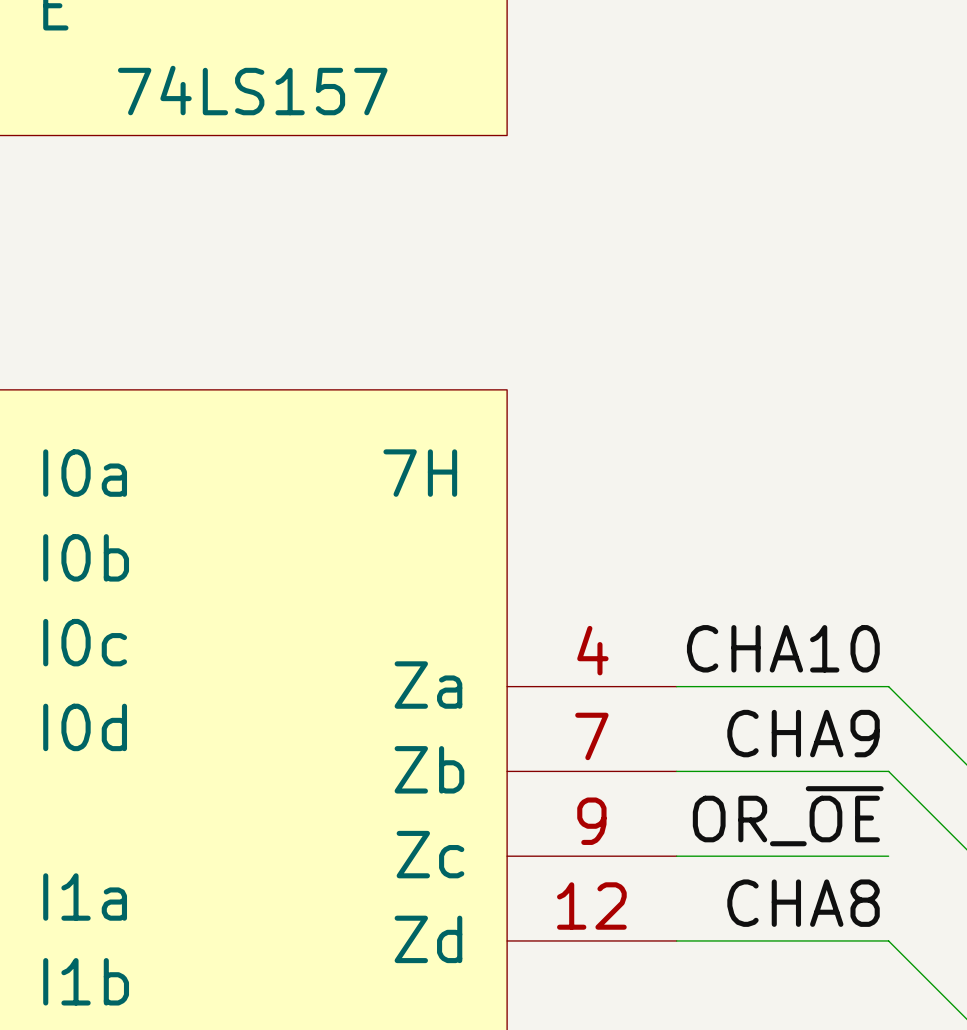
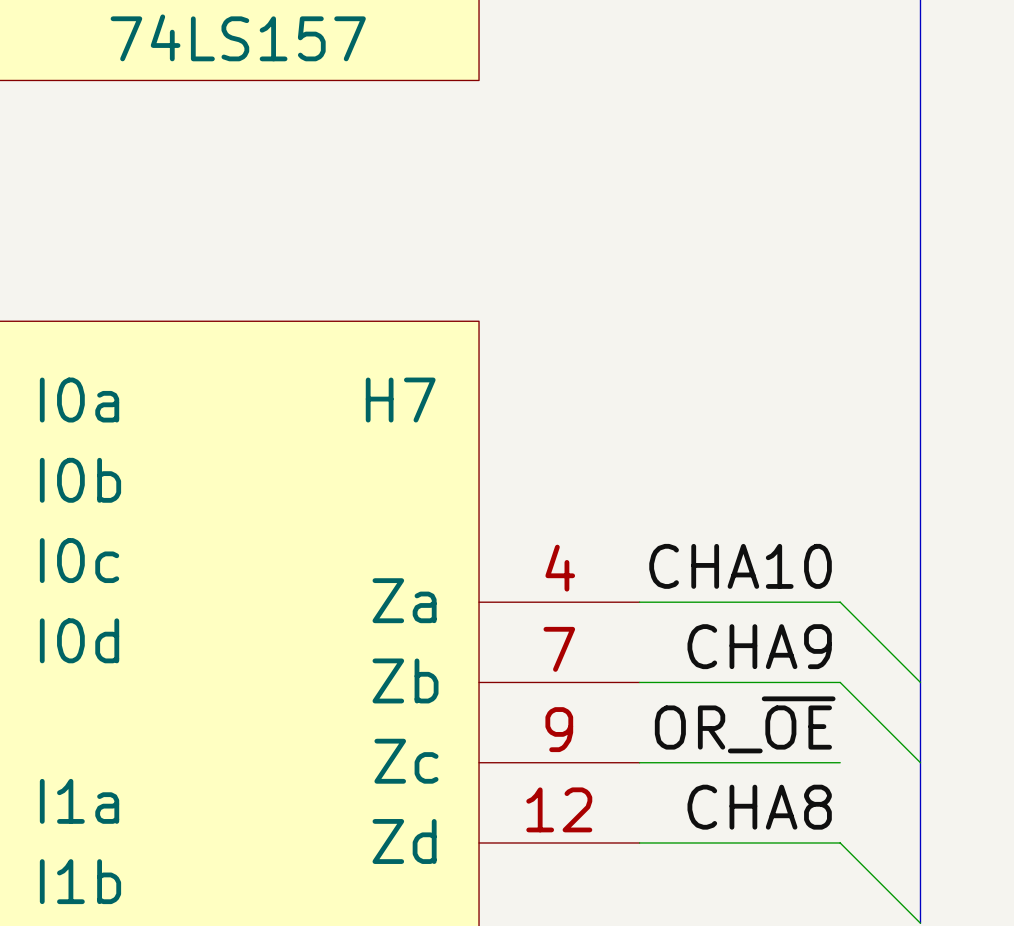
7H name: 7H (420, 473) -> H7 (400, 400)

